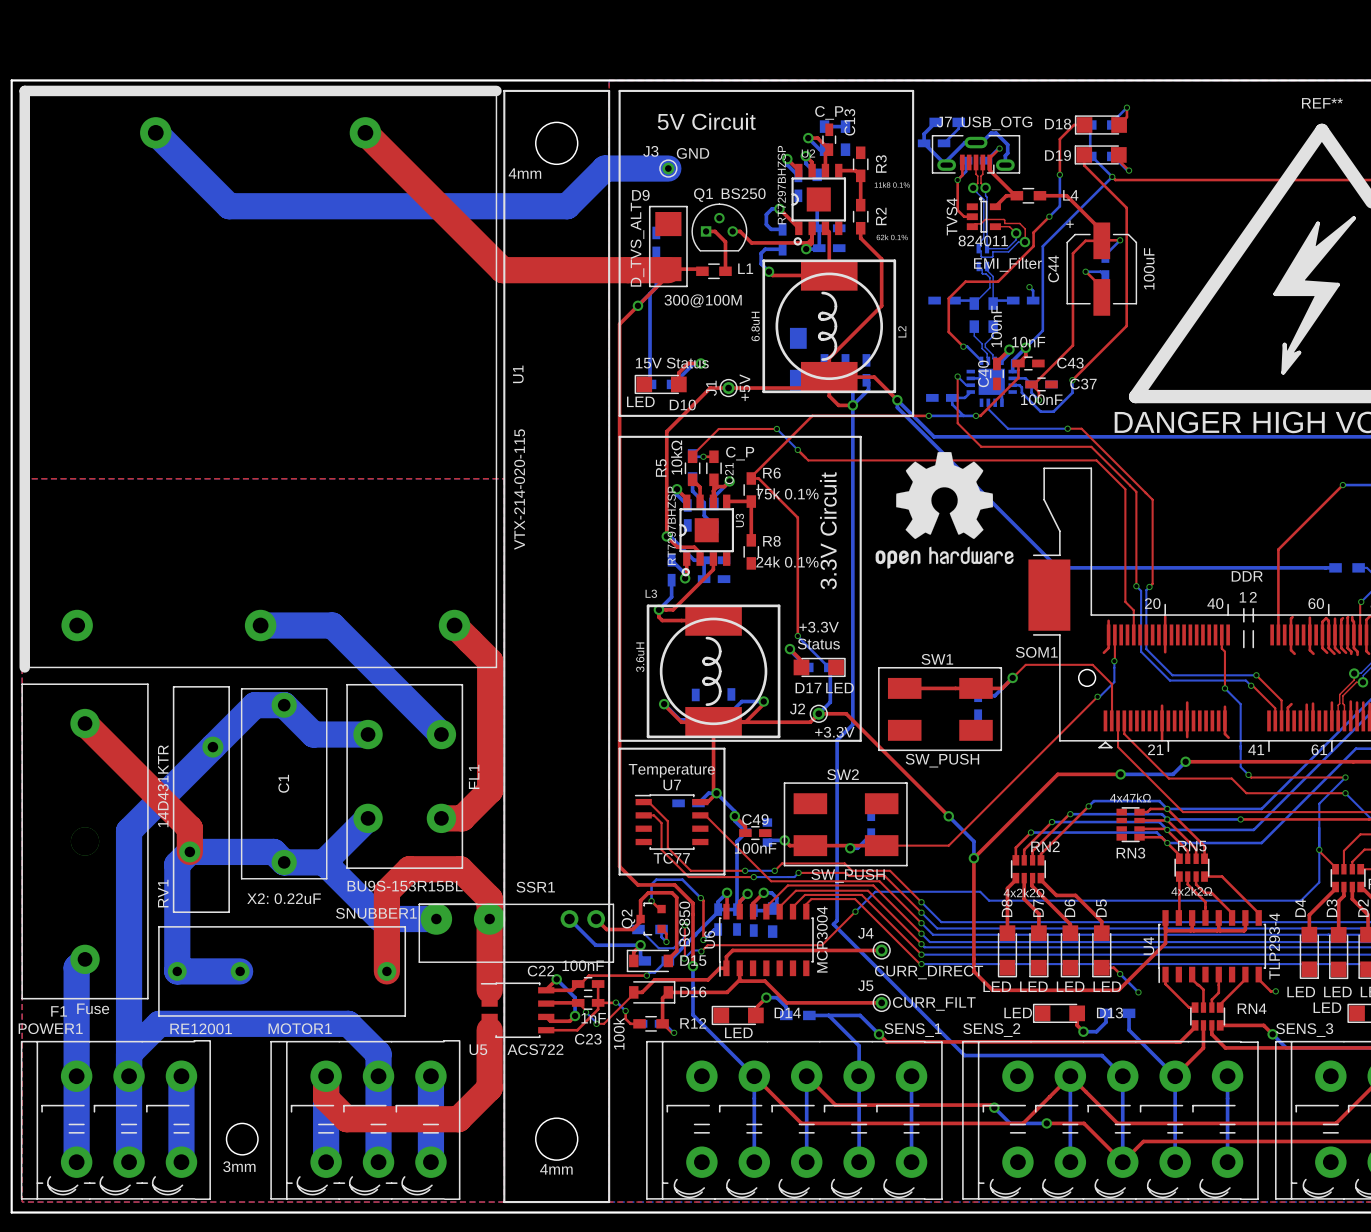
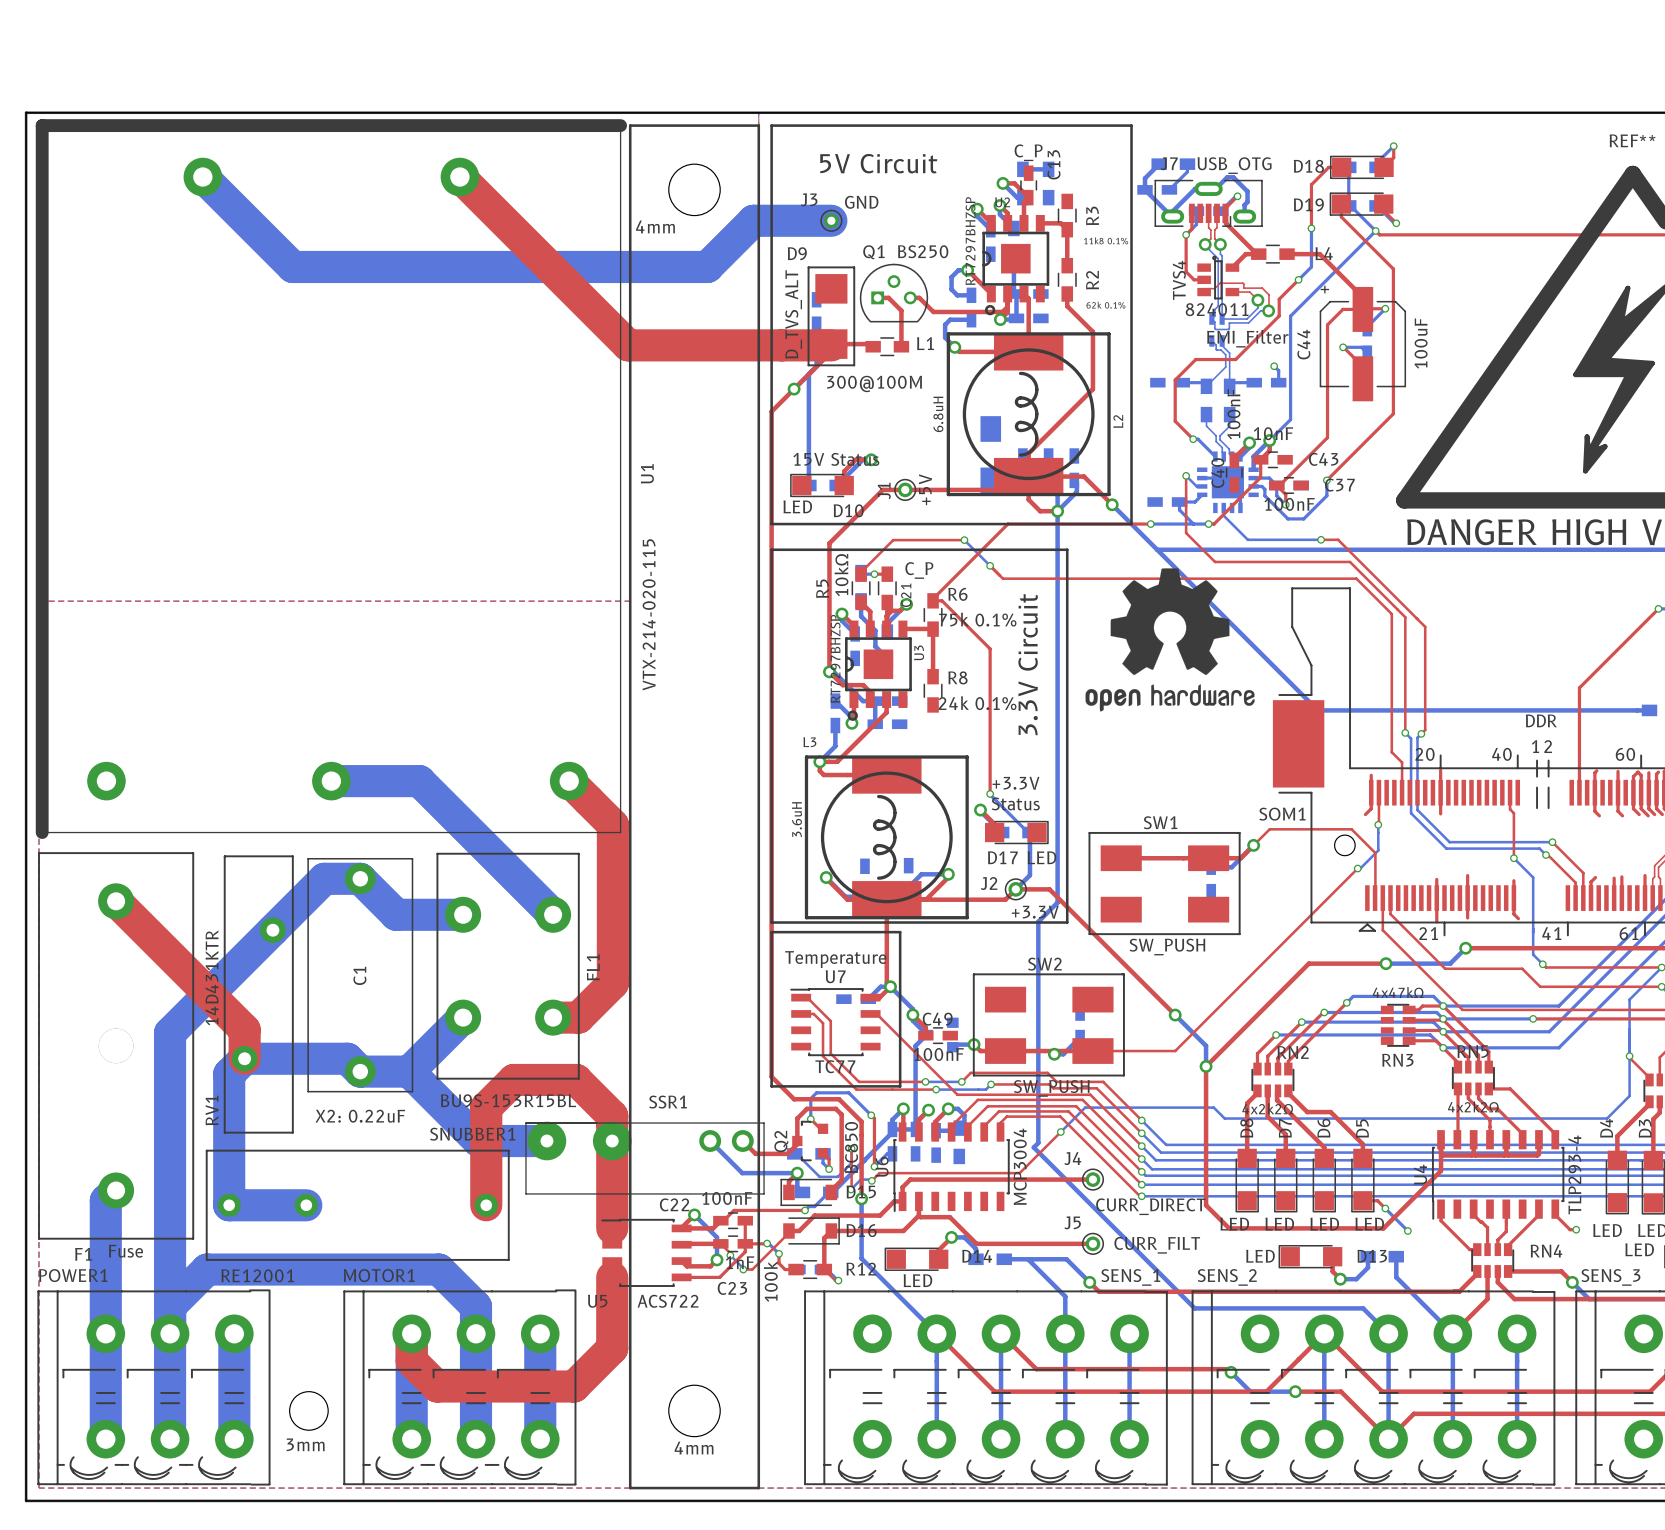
bottom track: (897, 400) (897, 407) (1057, 567) (1065, 567) -> (1157, 549) (1317, 710)

